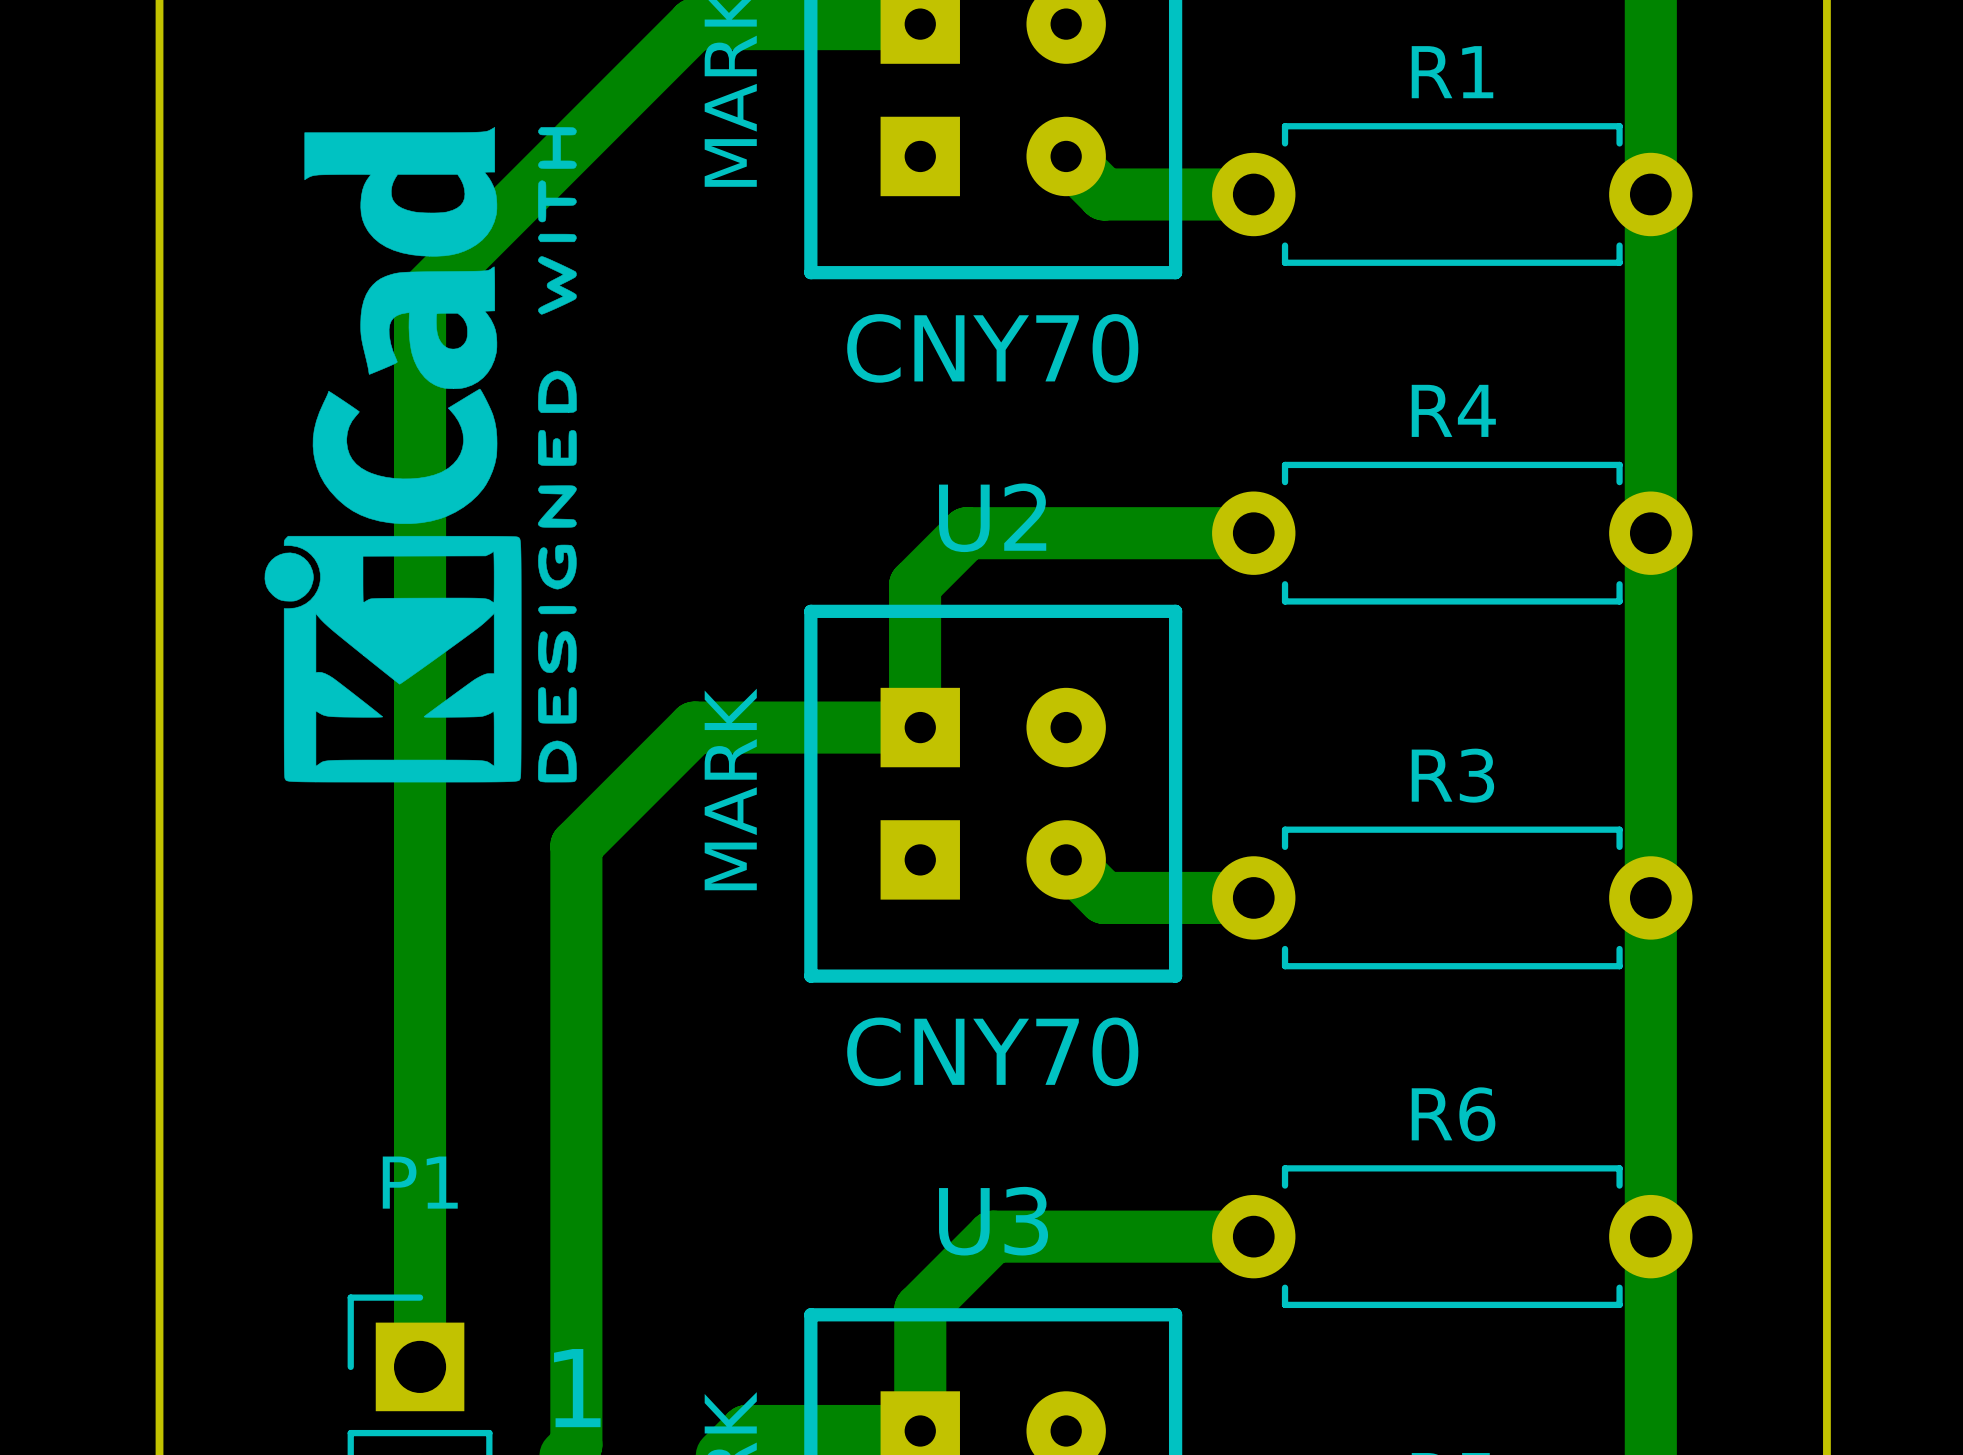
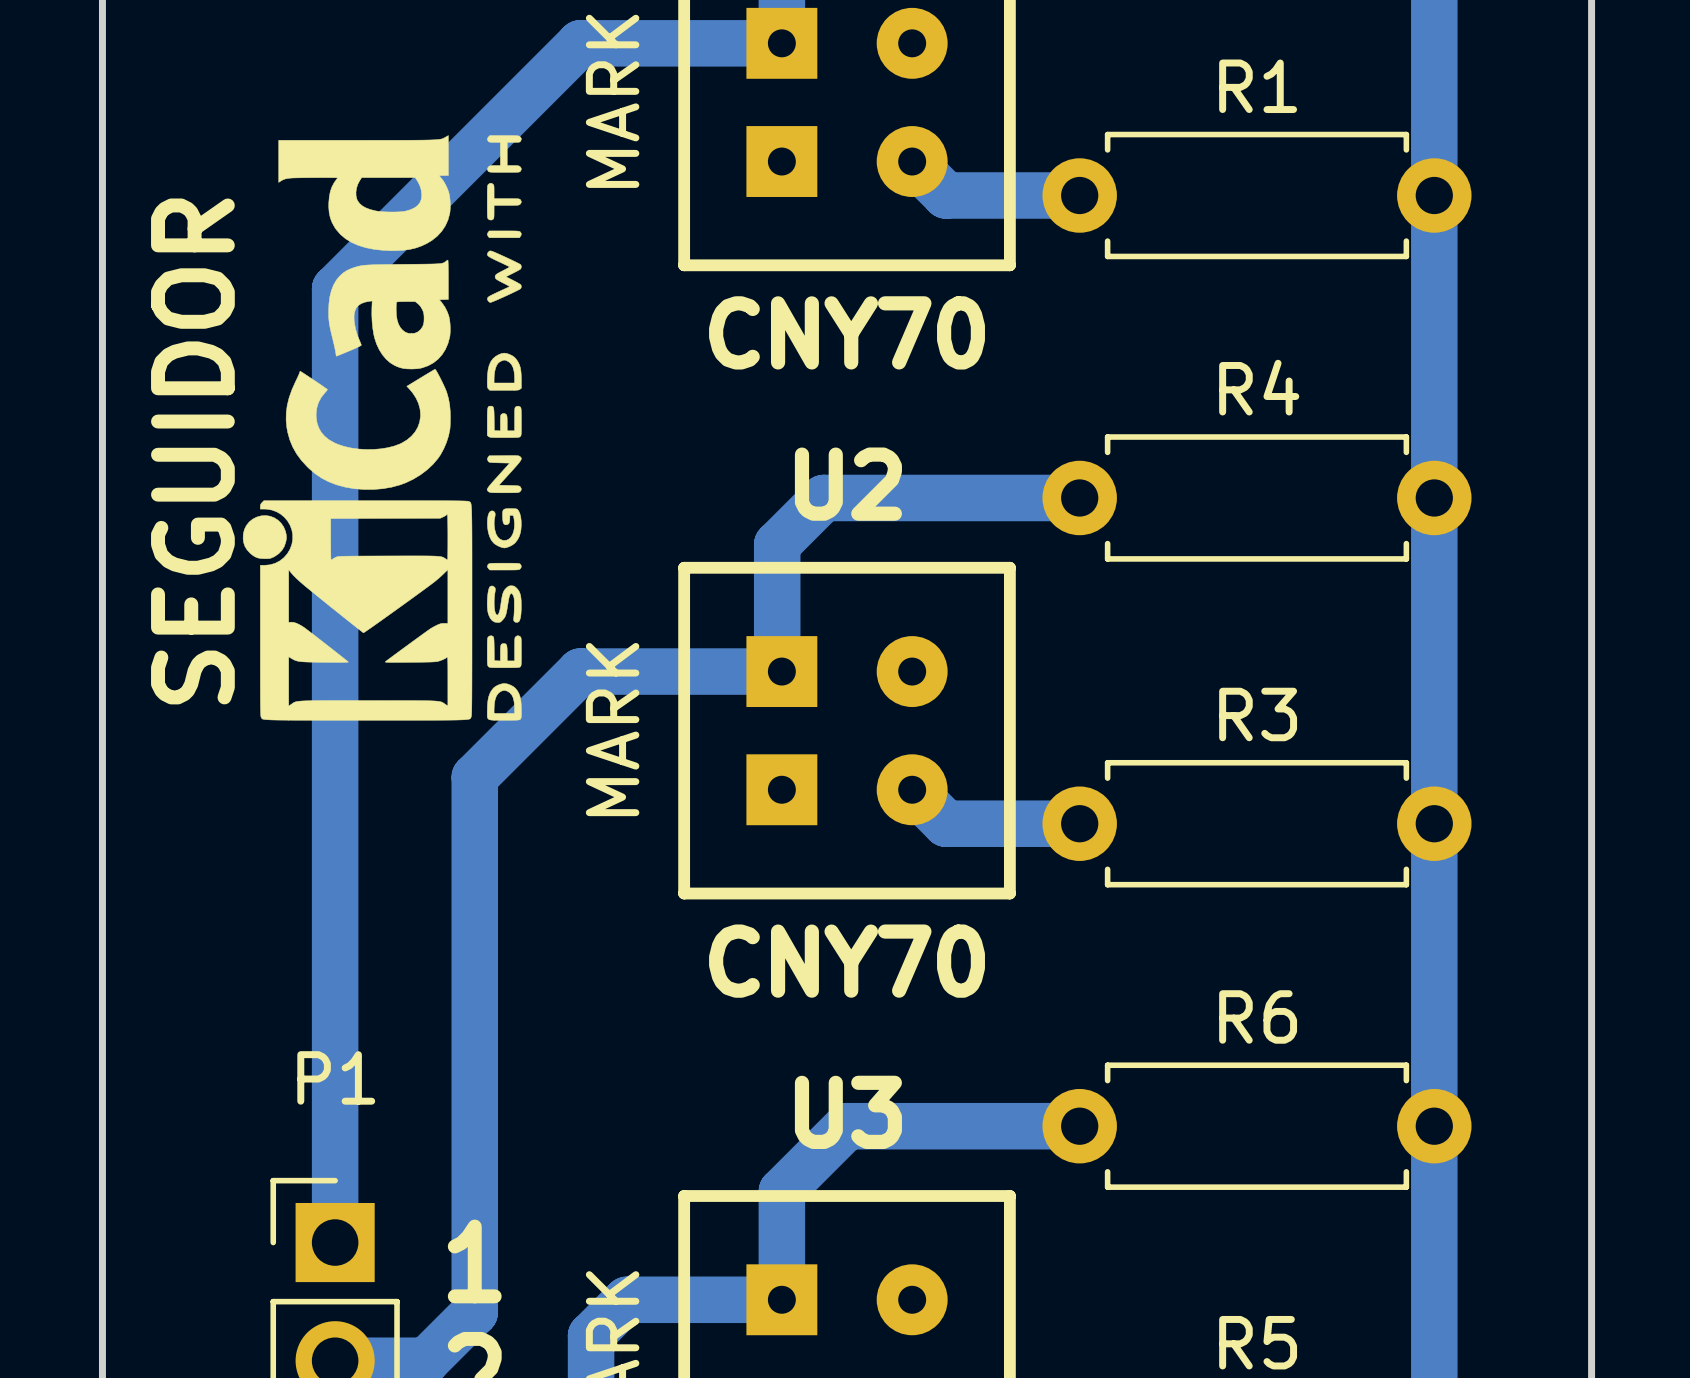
drawing position: (420, 454) -> (382, 427)
text: none -> SEGUIDOR (192, 451)

